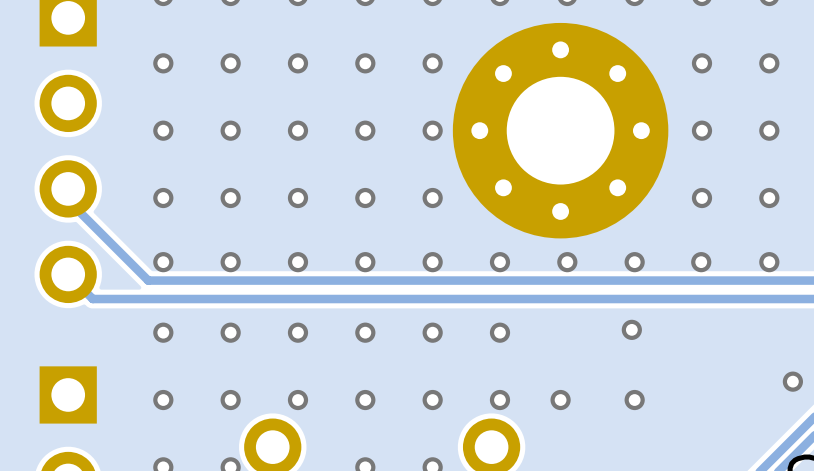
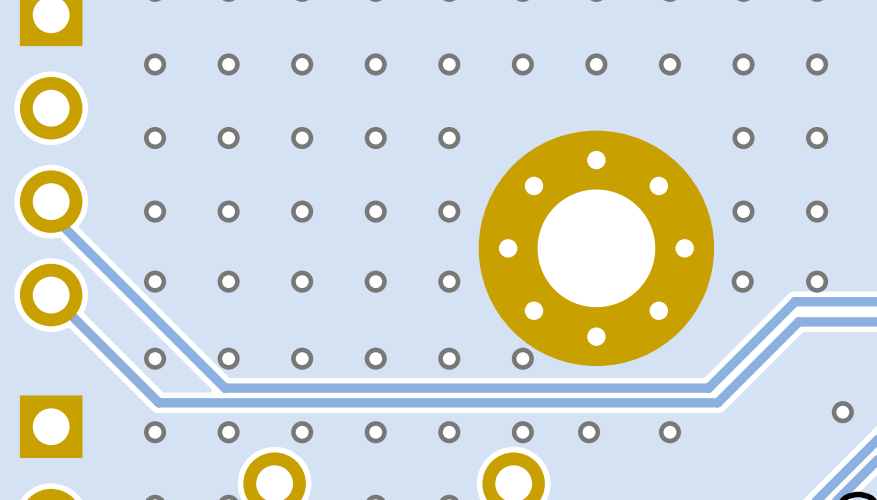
via: none -> (522, 64)
via: none -> (596, 64)
via: none -> (669, 64)
part position: (560, 130) -> (596, 248)
via: (499, 262) -> none
via: (567, 262) -> none
via: (634, 262) -> none
track: (749, 280) (148, 280) -> (795, 301) (708, 388) (224, 388) (138, 301)
track: (752, 299) (92, 299) -> (798, 321) (717, 402) (158, 402) (78, 321)
via: (631, 329) -> none

